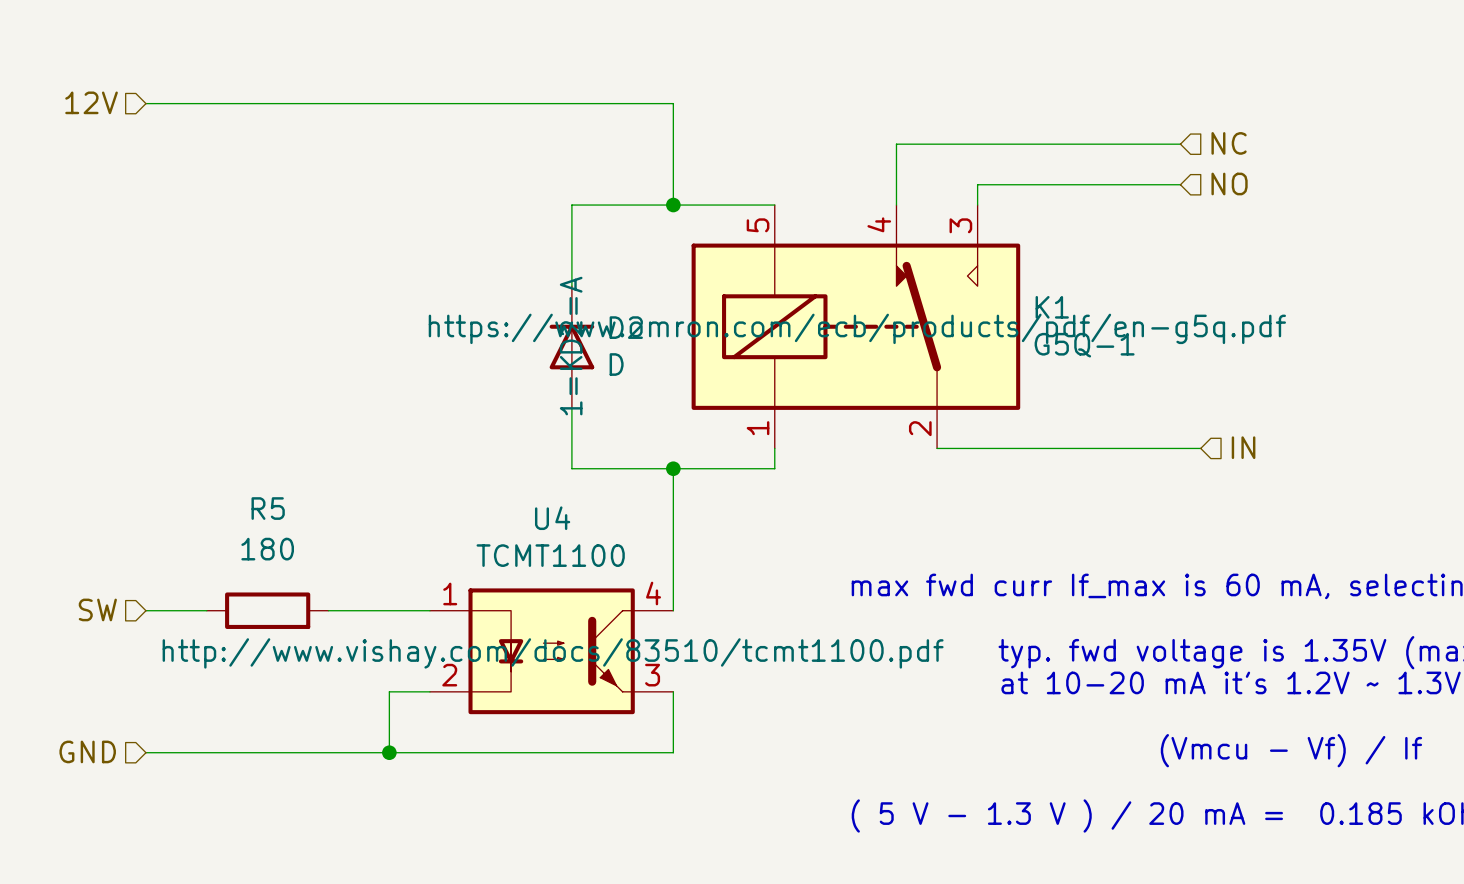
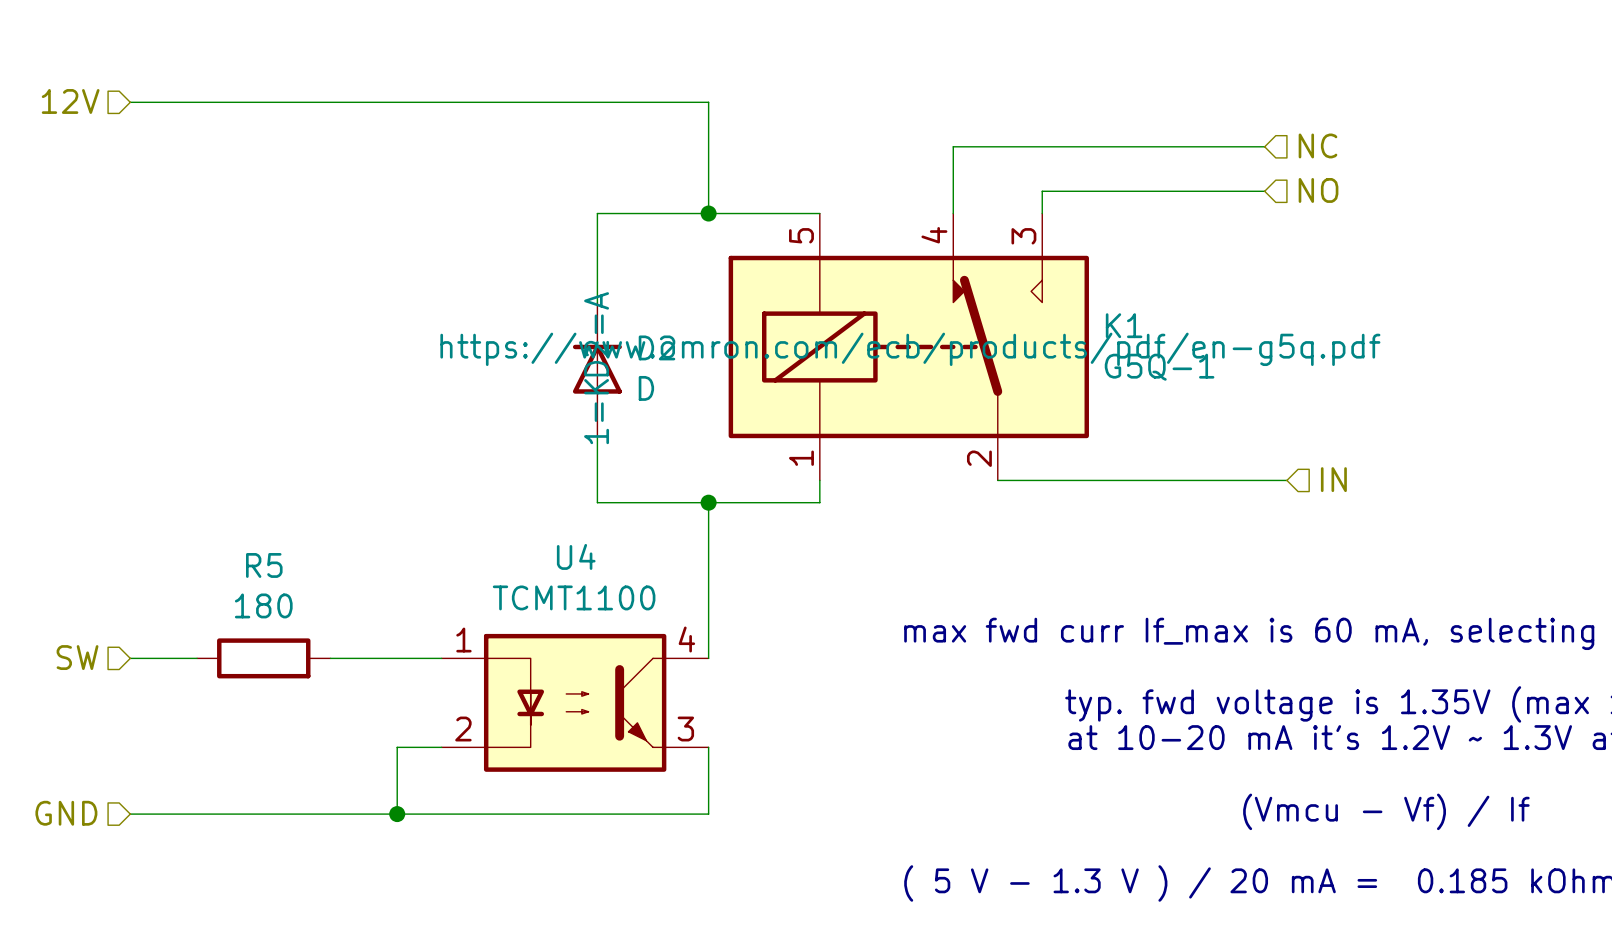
R5 name position: R5 (268, 508) -> R5 (264, 565)
R5 value position: 180 (267, 549) -> 180 (263, 605)
U4 text: http://www.vishay.com/docs/83510/tcmt1100.pdf (553, 653) -> none

